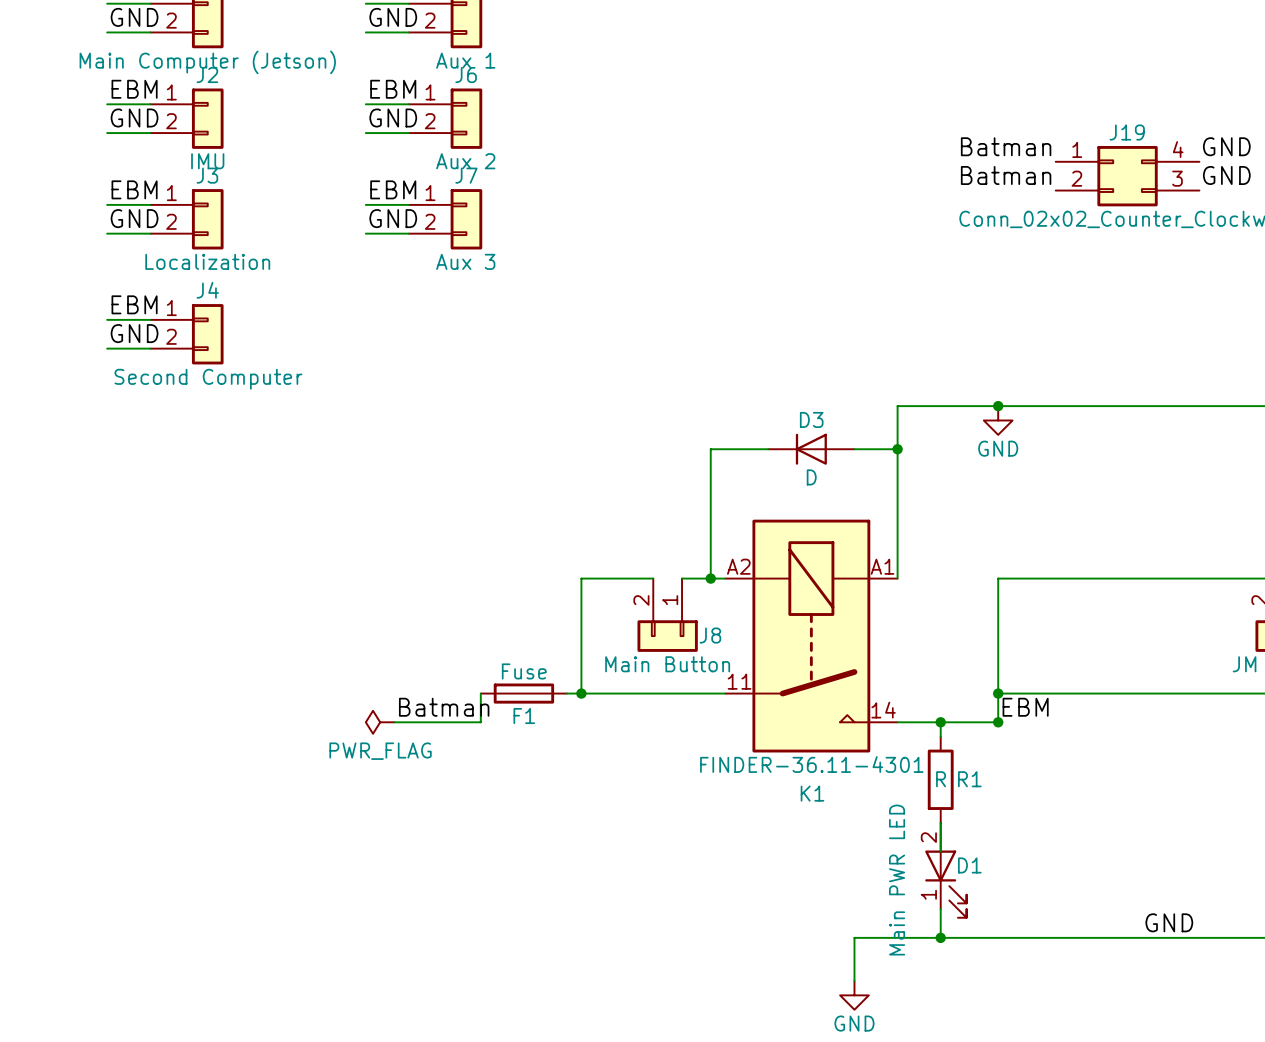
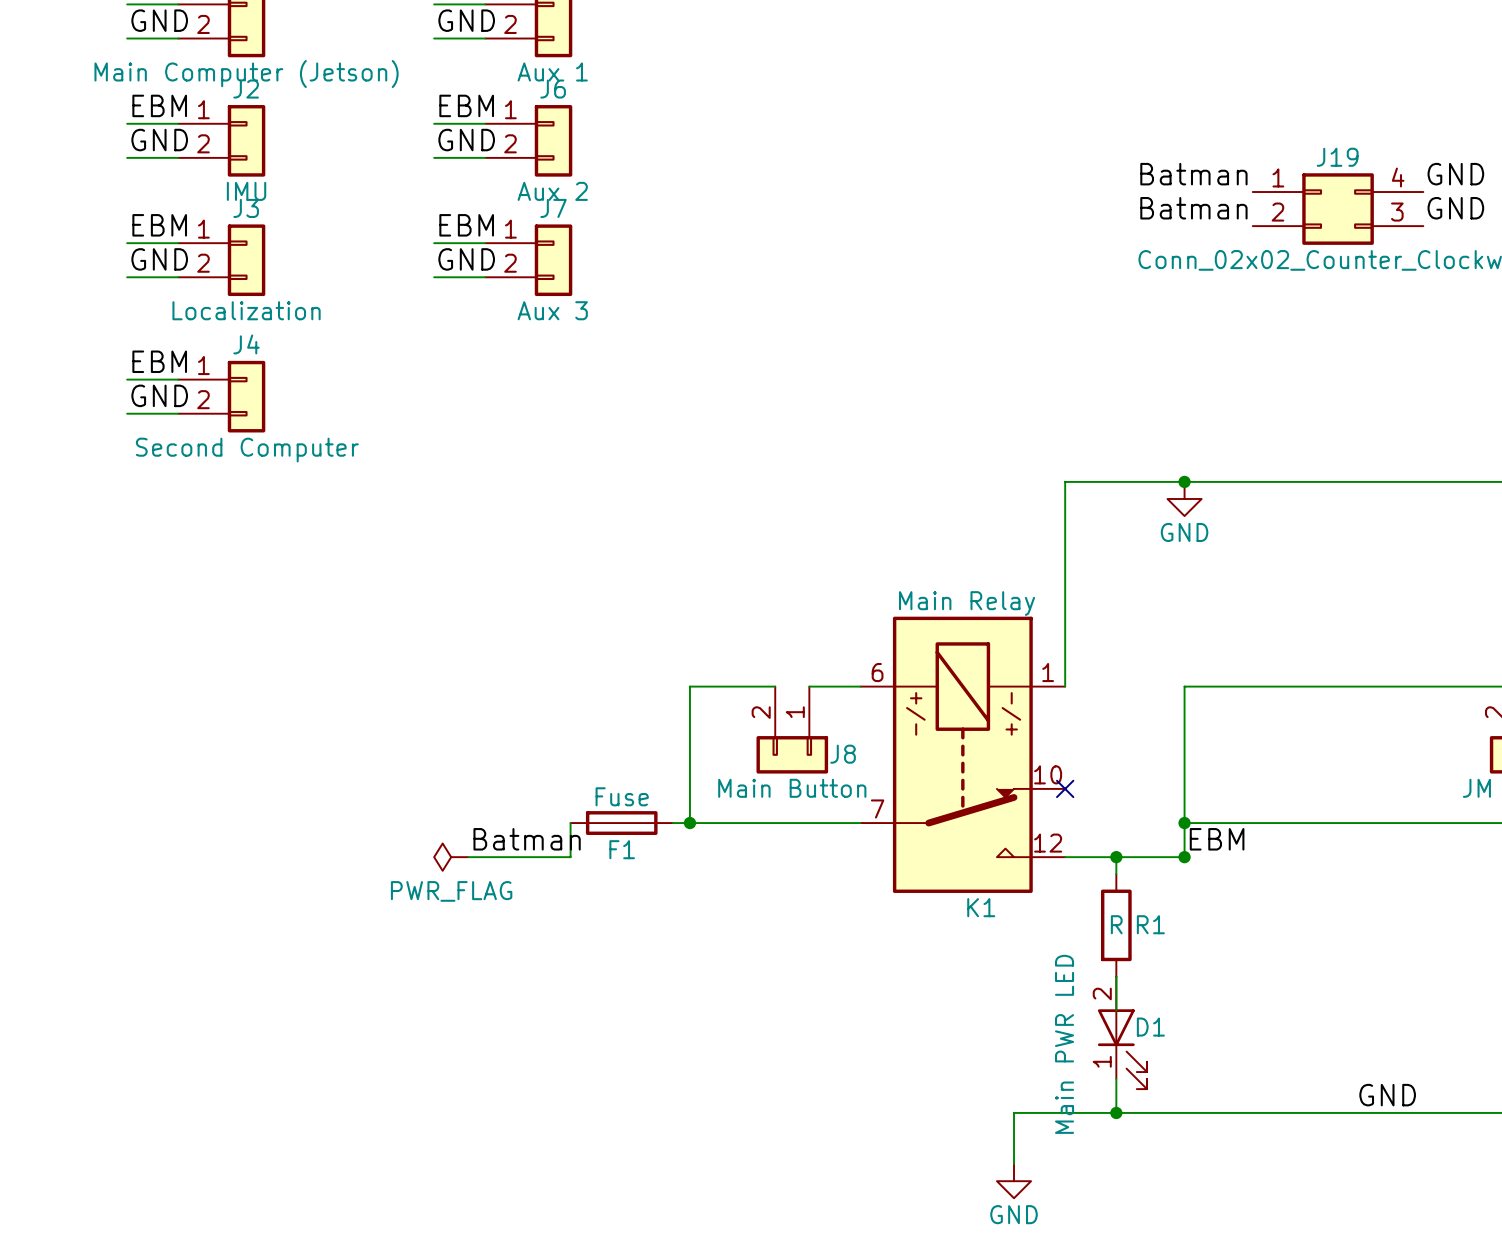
wire: (768, 449) (710, 449) (710, 578) -> none
D3: D (811, 449) -> none
wire: (854, 449) (897, 449) -> none
junction: (897, 449) -> none
K1 symbol: [725, 519, 898, 753] -> [860, 616, 1066, 893]
junction: (710, 578) -> none
no-connect mark: none -> (1065, 788)
K1 value: FINDER-36.11-4301 (811, 764) -> Main Relay (967, 603)
K1 name position: K1 (812, 793) -> K1 (981, 907)

